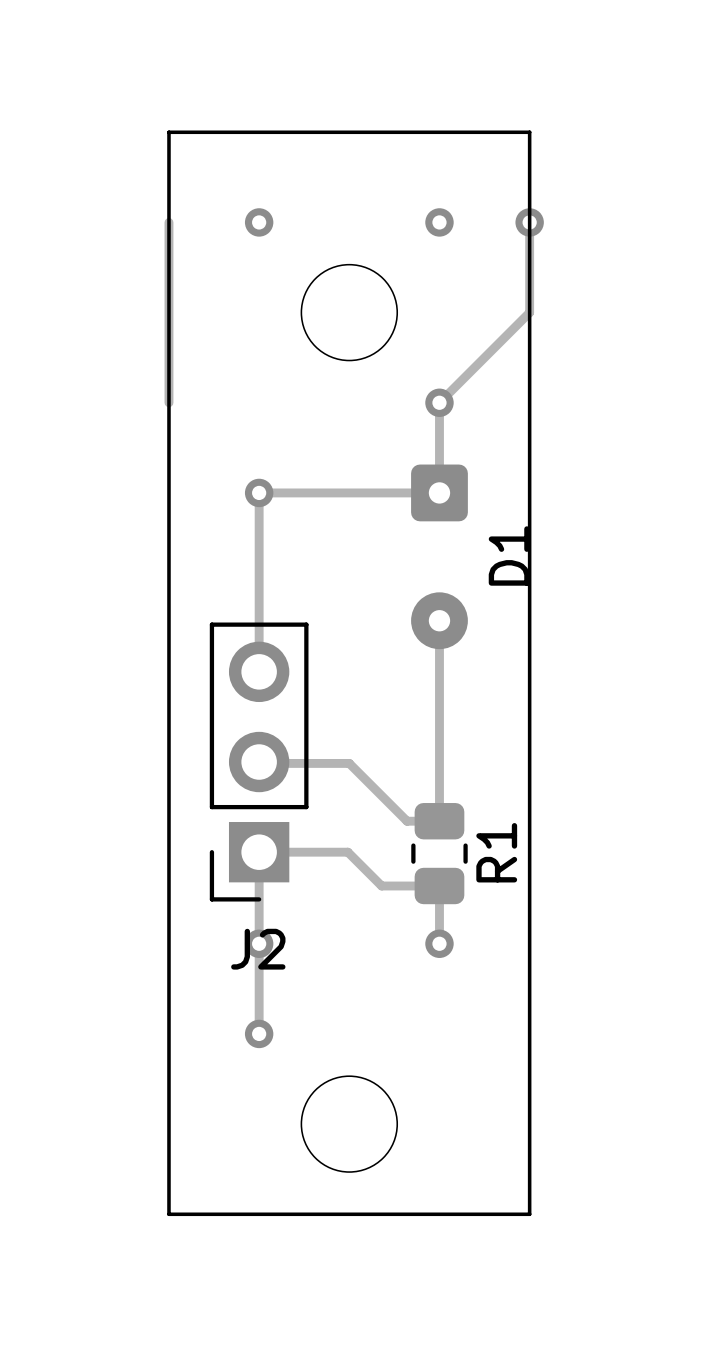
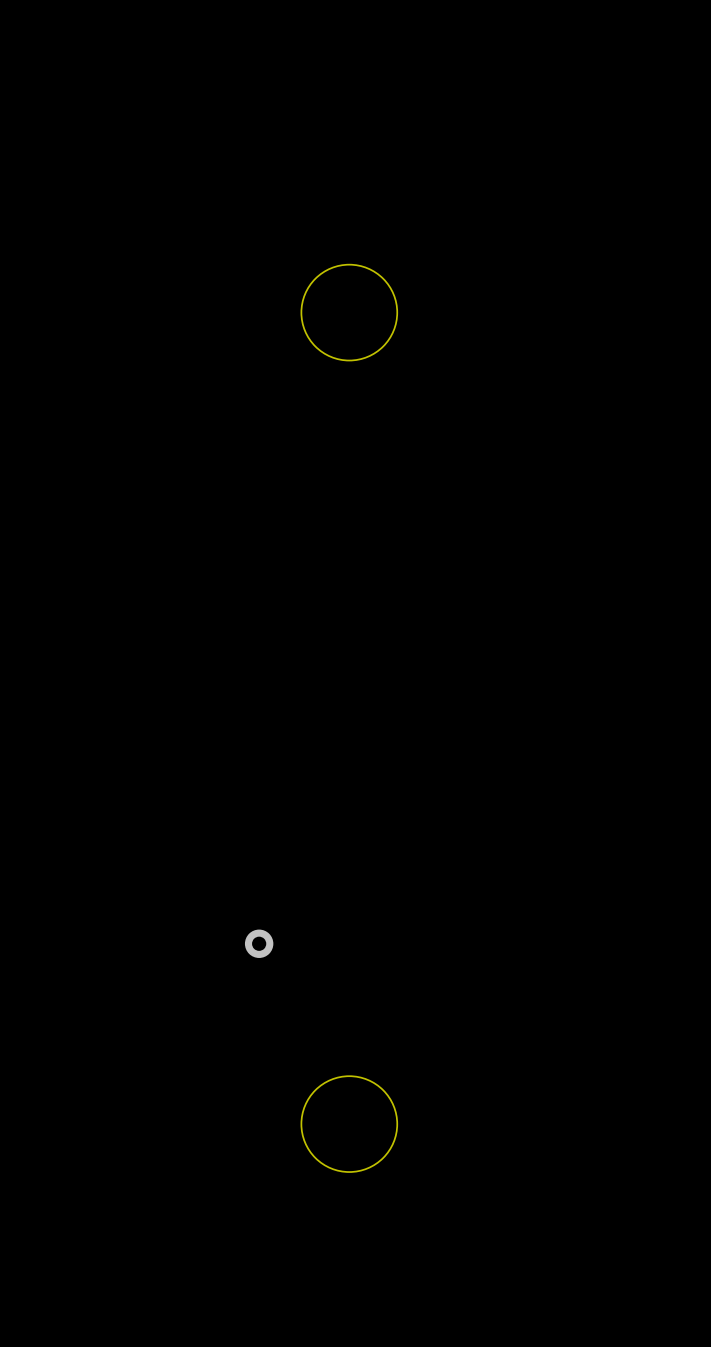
board edge: (168, 132) (529, 132) (529, 1214) (168, 1214) (168, 132) -> none
track: (168, 222) (168, 402) -> none
via: (259, 222) -> none
via: (439, 222) -> none
track: (529, 222) (529, 312) (439, 402) (439, 492) (259, 492) (259, 674) -> none
via: (529, 222) -> none
via: (439, 402) -> none
via: (259, 492) -> none
D1: (439, 556) -> none
track: (439, 620) (439, 821) (407, 821) (349, 763) (259, 763) -> none
J2: (259, 762) -> none
R1: (439, 853) -> none
track: (439, 943) (439, 886) (381, 886) (347, 852) (259, 852) (259, 1033) -> none
via: (439, 943) -> none
via: (259, 1033) -> none

